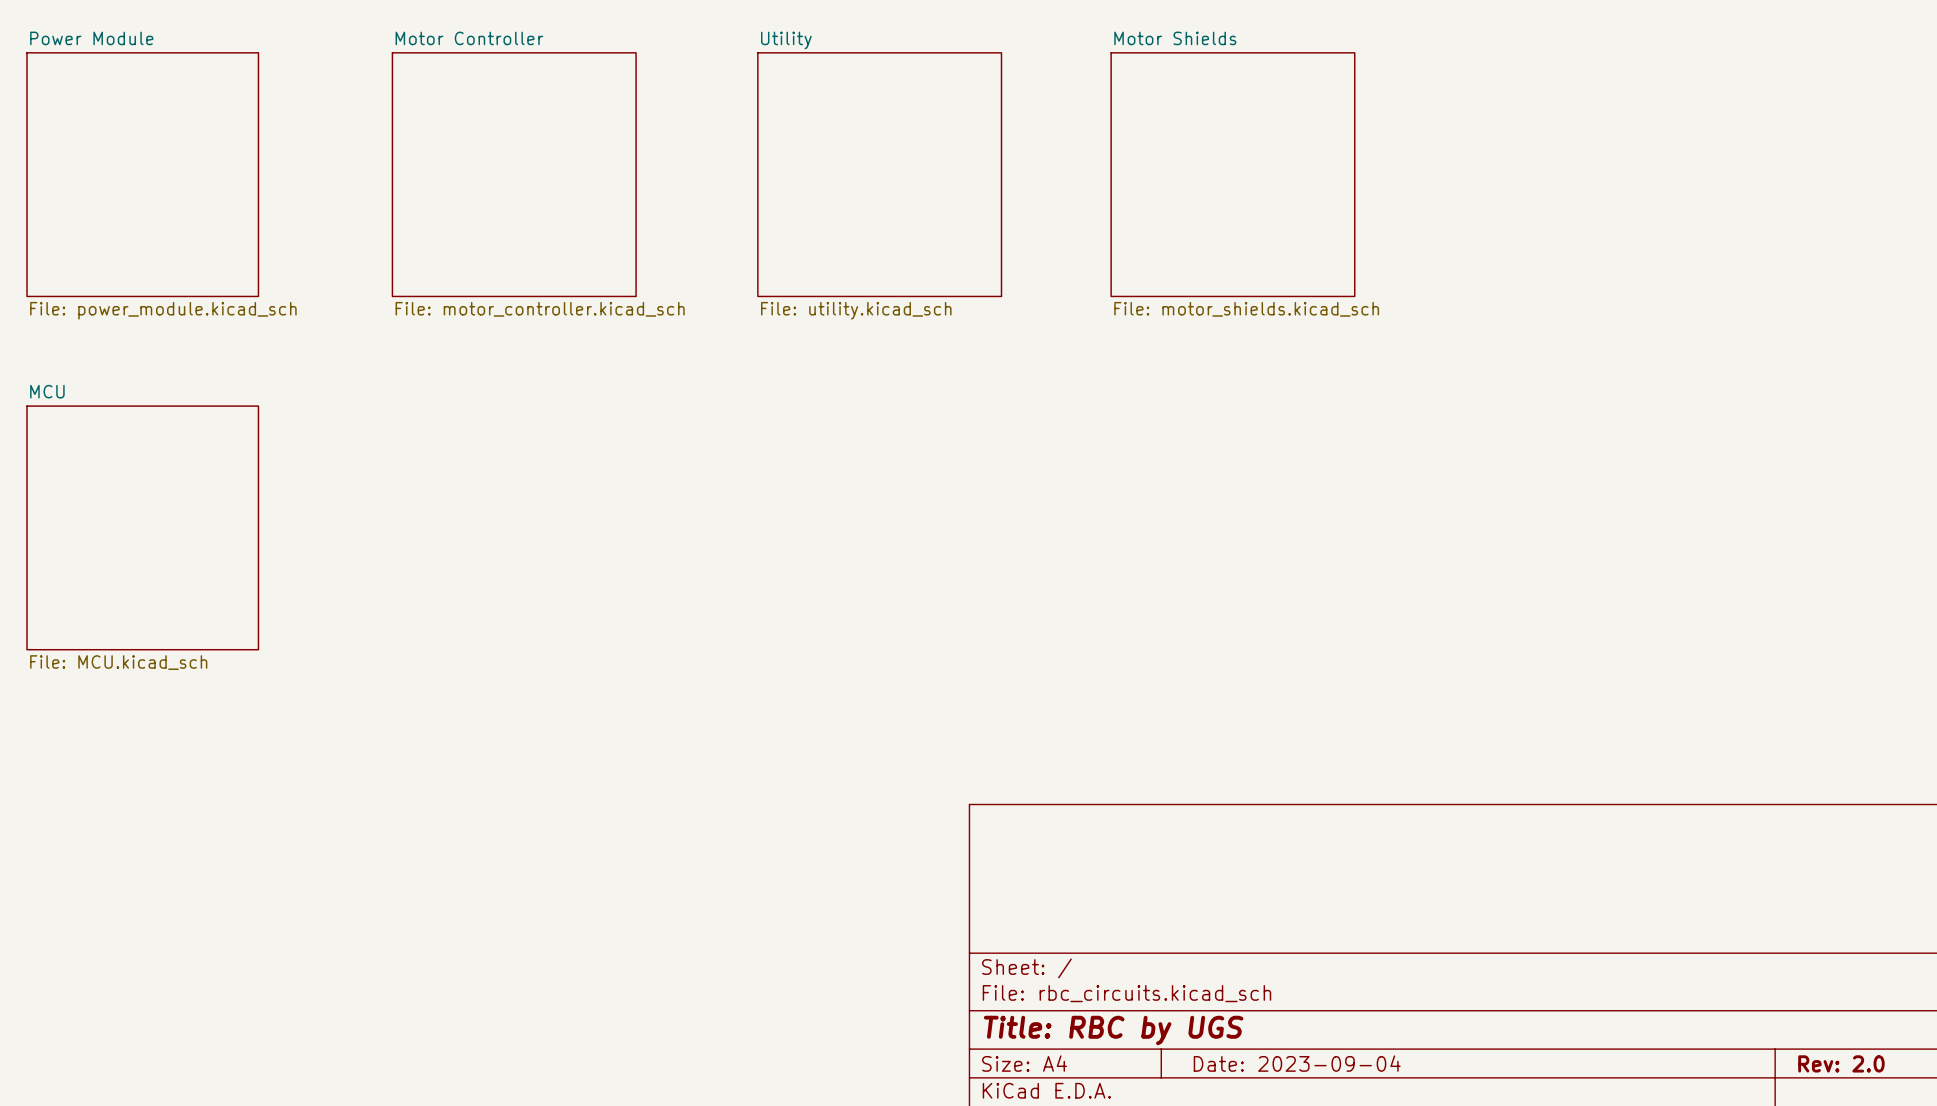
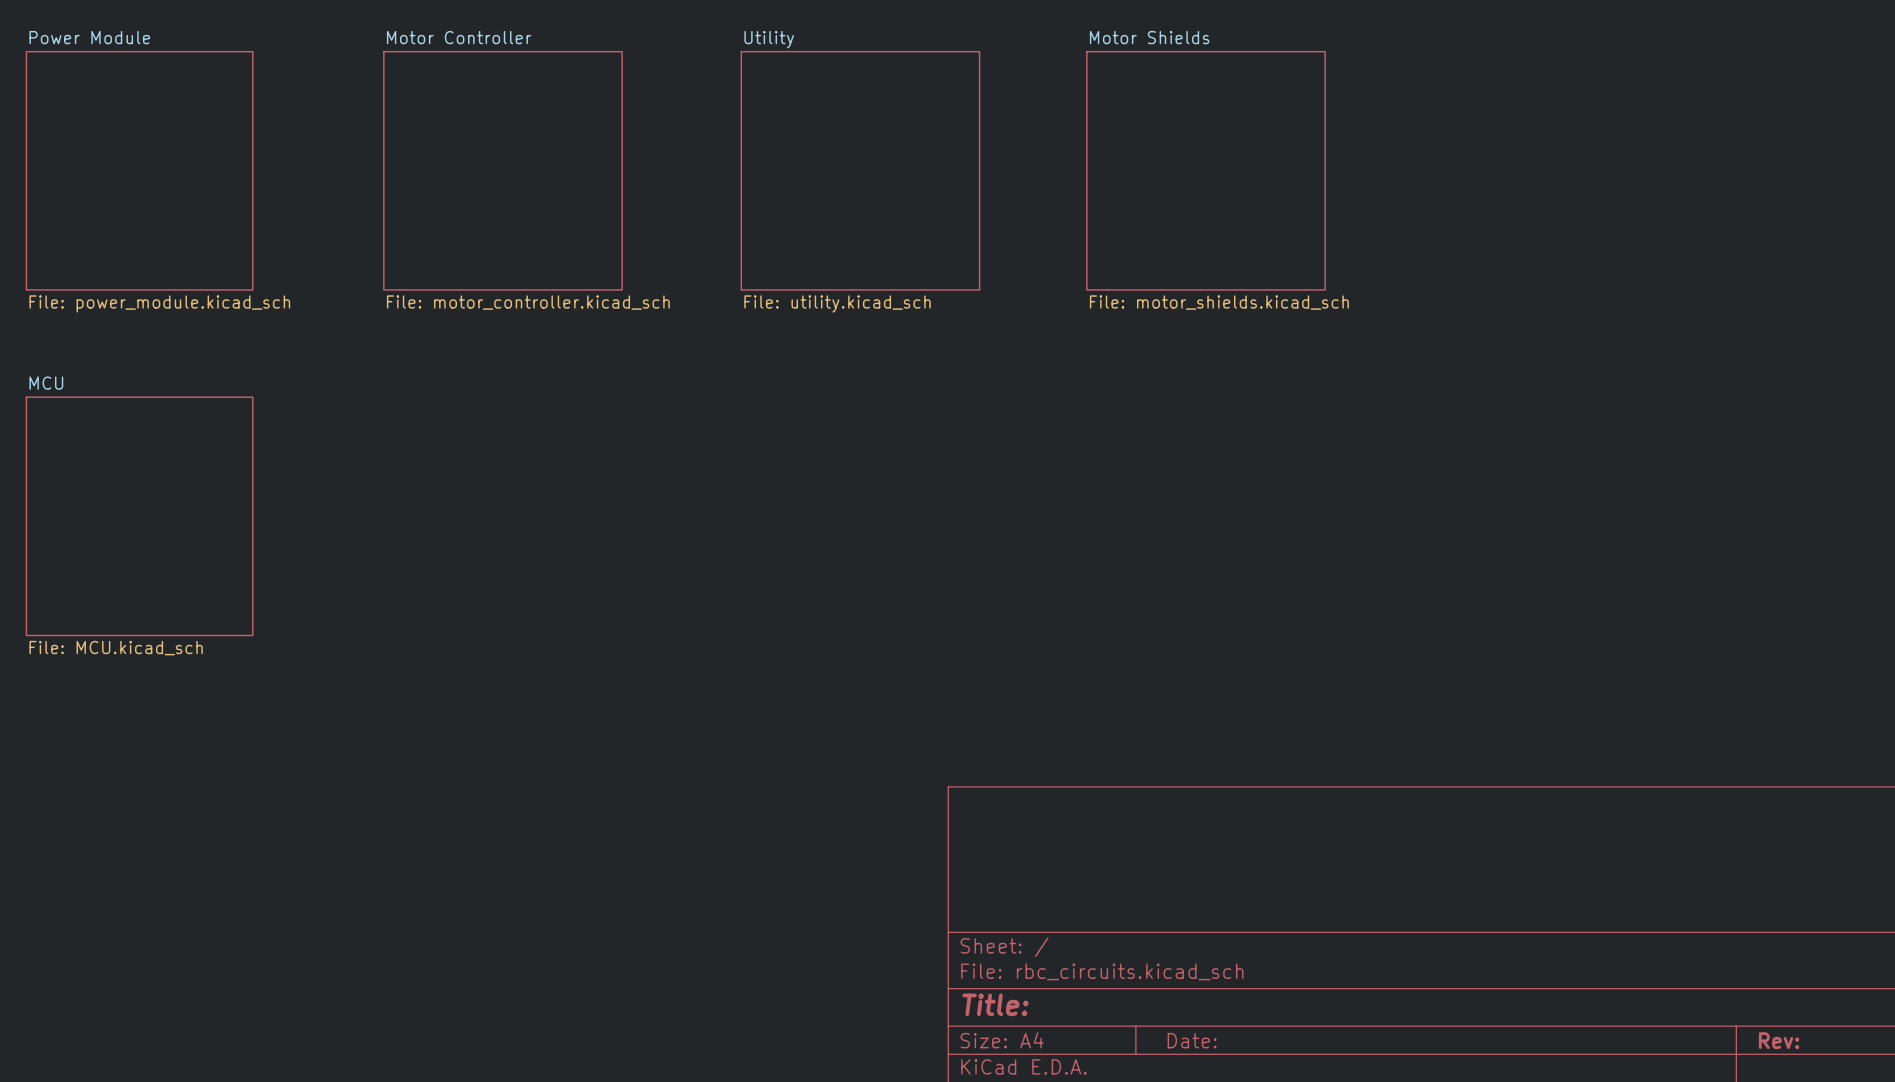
title block: Title: RBC by UGS (1113, 1030) -> Title: (995, 1004)
title block: Date: 2023-09-04 (1297, 1063) -> Date: (1192, 1040)
title block: Rev: 2.0 (1841, 1063) -> Rev: (1779, 1040)

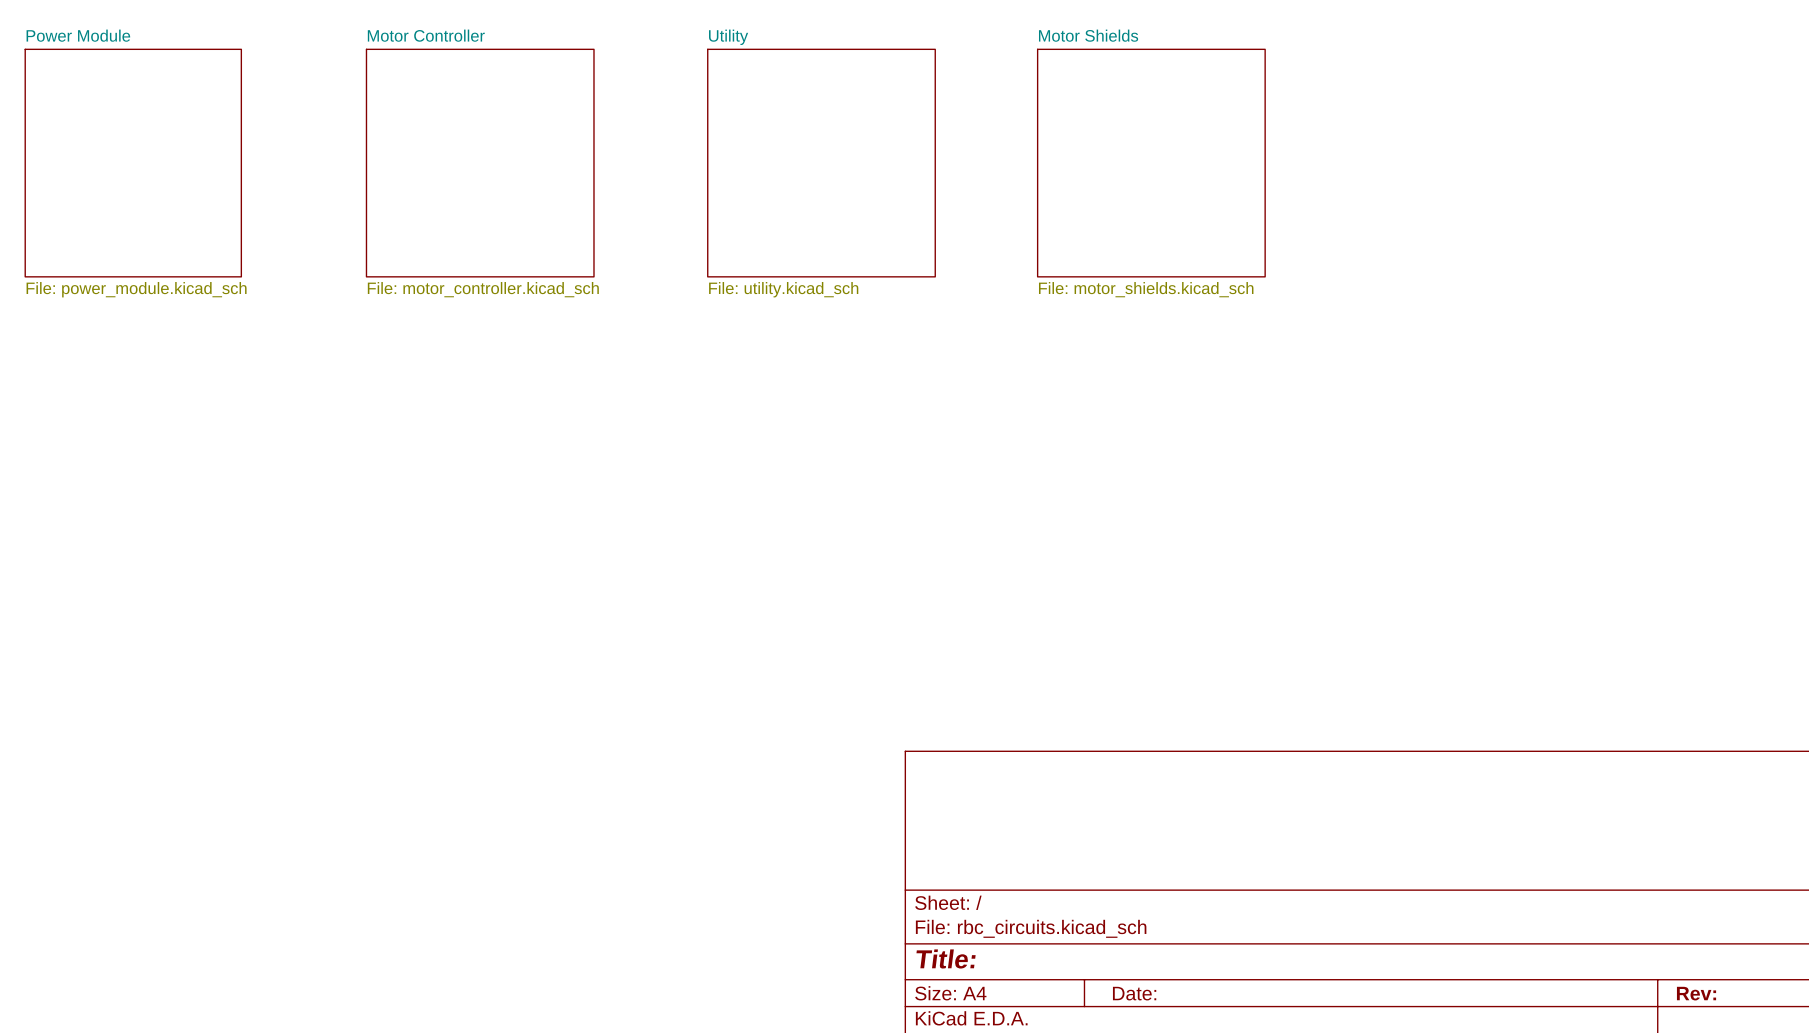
sheet MCU: File: MCU.kicad_sch (139, 516) -> none

